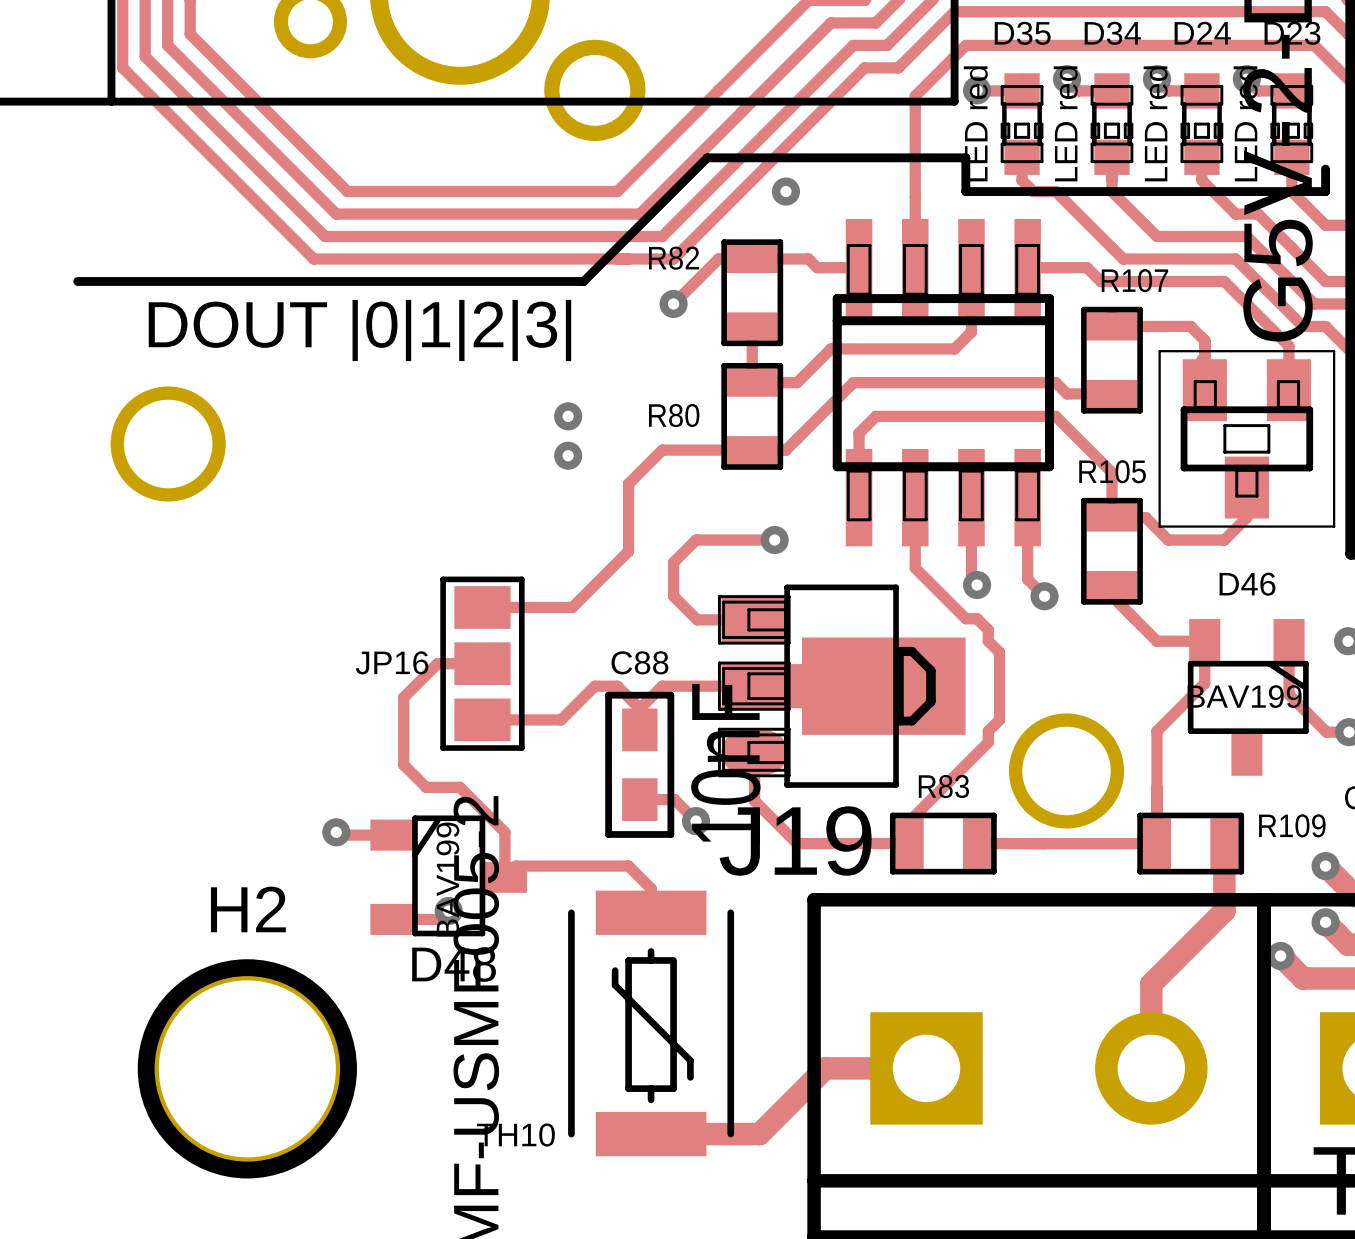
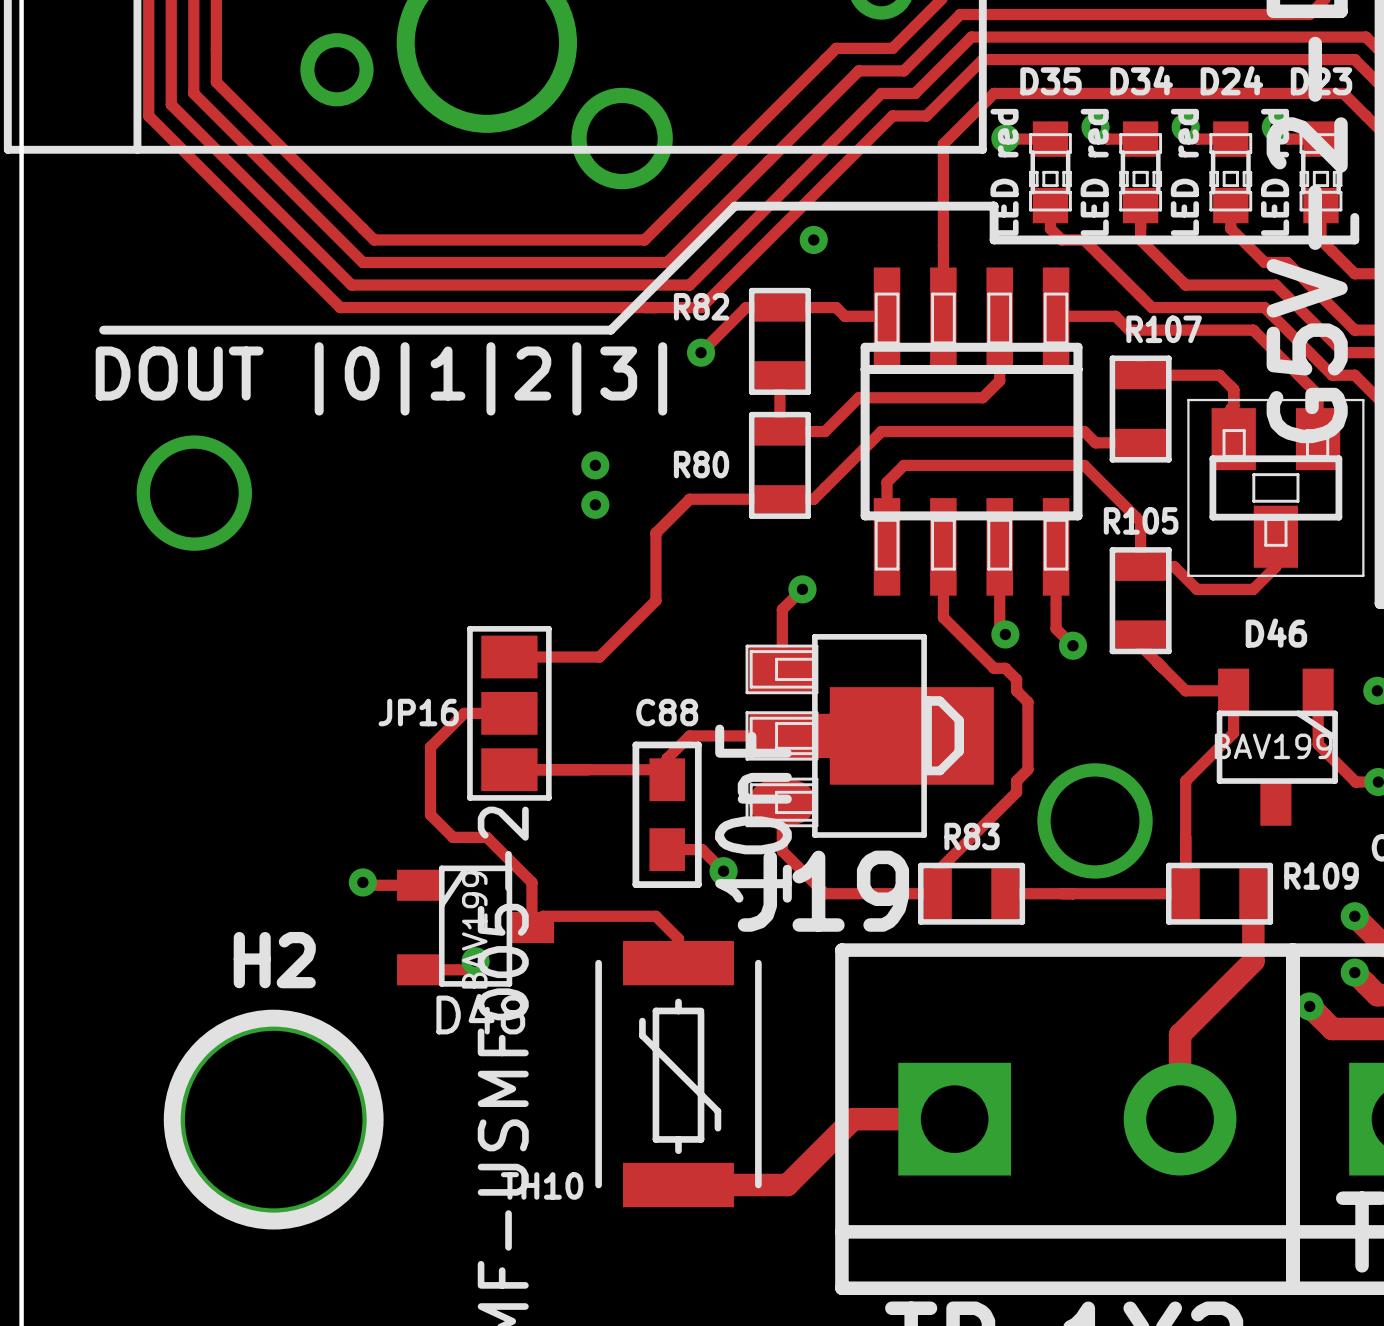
track: (774, 540) (696, 540) (673, 562) (673, 596) (697, 619) (754, 619) -> (802, 589) (782, 609) (782, 669)
track: (639, 708) (617, 686) (594, 686) (561, 719) -> (667, 779) (657, 769) (588, 769)

